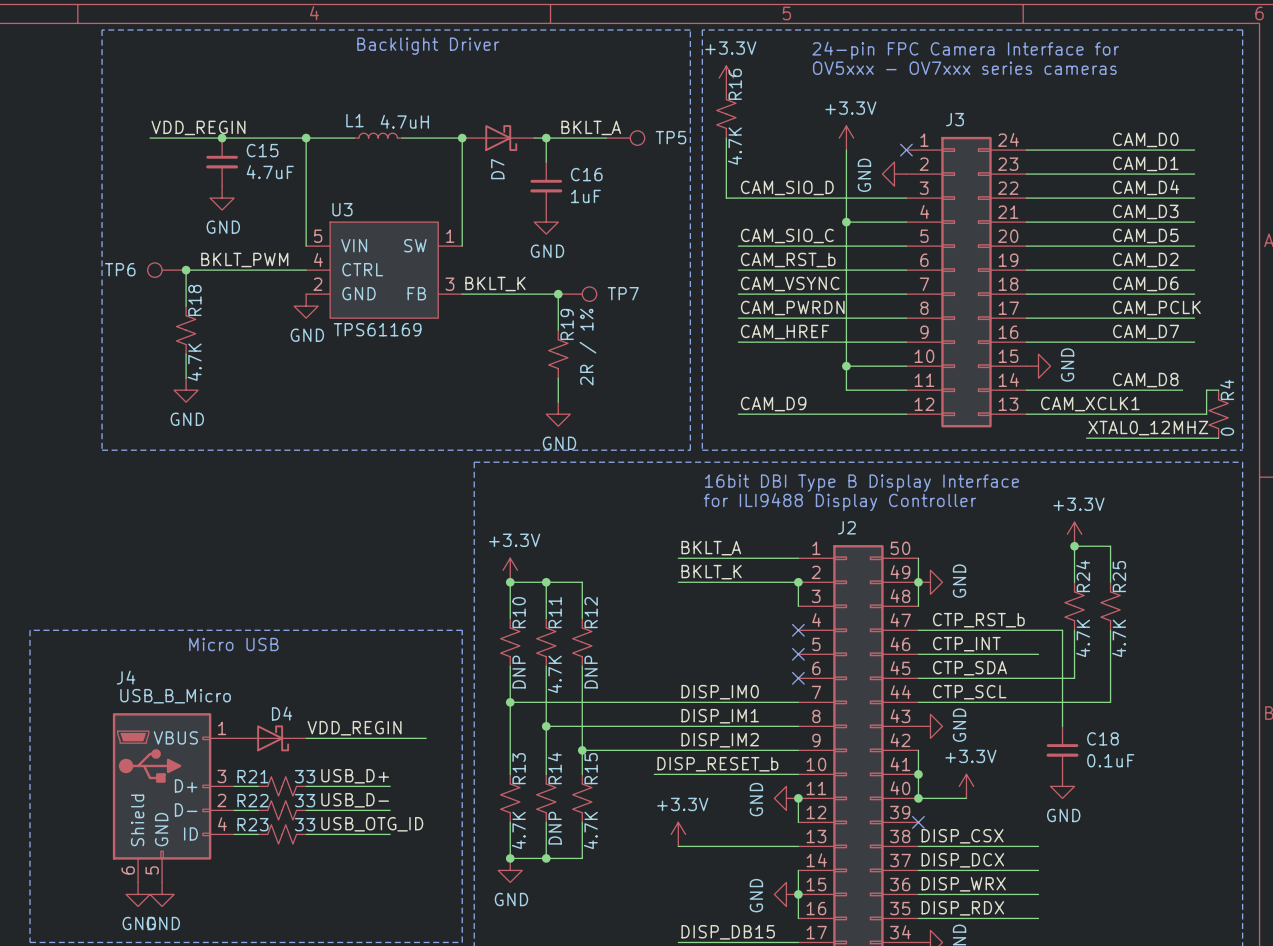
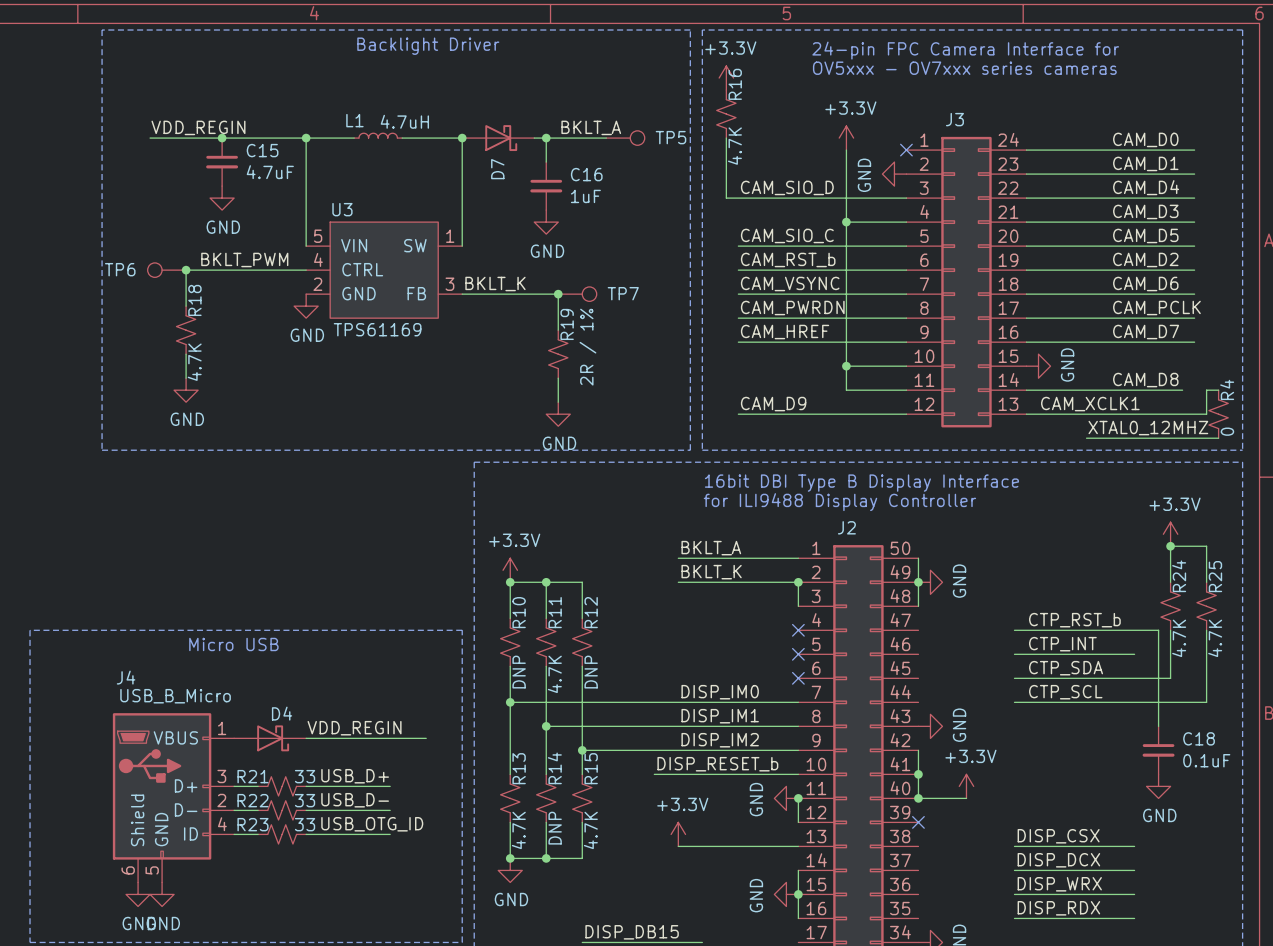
power symbol position: +3.3V (1074, 534) -> +3.3V (1170, 534)
junction: (1074, 546) -> none
junction: none -> (1170, 546)
wire: (1074, 582) (1074, 546) (1110, 546) (1110, 582) -> (1170, 582) (1170, 546) (1206, 546) (1206, 582)
R24 position: (1074, 606) -> (1170, 606)
R25 position: (1110, 606) -> (1206, 606)
label position: CTP_RST_b (978, 620) -> CTP_RST_b (1074, 620)
wire: (918, 630) (1014, 630) -> none
wire: (1062, 630) (1062, 726) -> (1062, 630) (1158, 630) (1158, 726)
wire: (1074, 630) (1074, 678) -> (1170, 630) (1170, 678) (1074, 678)
wire: (1110, 630) (1110, 702) -> (1206, 630) (1206, 702) (1110, 702)
label position: CTP_INT (966, 644) -> CTP_INT (1062, 644)
wire: (918, 654) (1014, 654) -> (1038, 654) (1134, 654)
label position: CTP_SDA (969, 668) -> CTP_SDA (1066, 668)
wire: (918, 678) (1014, 678) -> none
label position: CTP_SCL (969, 692) -> CTP_SCL (1065, 692)
wire: (918, 702) (1014, 702) -> none
C18 position: (1062, 750) -> (1158, 750)
power symbol position: GND (1062, 786) -> GND (1158, 786)
label position: DISP_CSX (962, 836) -> DISP_CSX (1058, 836)
wire: (918, 846) (1014, 846) -> (1038, 846) (1134, 846)
label position: DISP_DCX (962, 860) -> DISP_DCX (1058, 860)
wire: (918, 870) (1014, 870) -> (1038, 870) (1134, 870)
label position: DISP_WRX (963, 884) -> DISP_WRX (1059, 884)
wire: (918, 894) (1014, 894) -> (1038, 894) (1134, 894)
label position: DISP_RDX (962, 908) -> DISP_RDX (1058, 908)
wire: (918, 918) (1014, 918) -> (1038, 918) (1134, 918)
label position: DISP_DB15 (728, 932) -> DISP_DB15 (632, 932)
wire: (702, 942) (798, 942) -> (582, 942) (678, 942)

